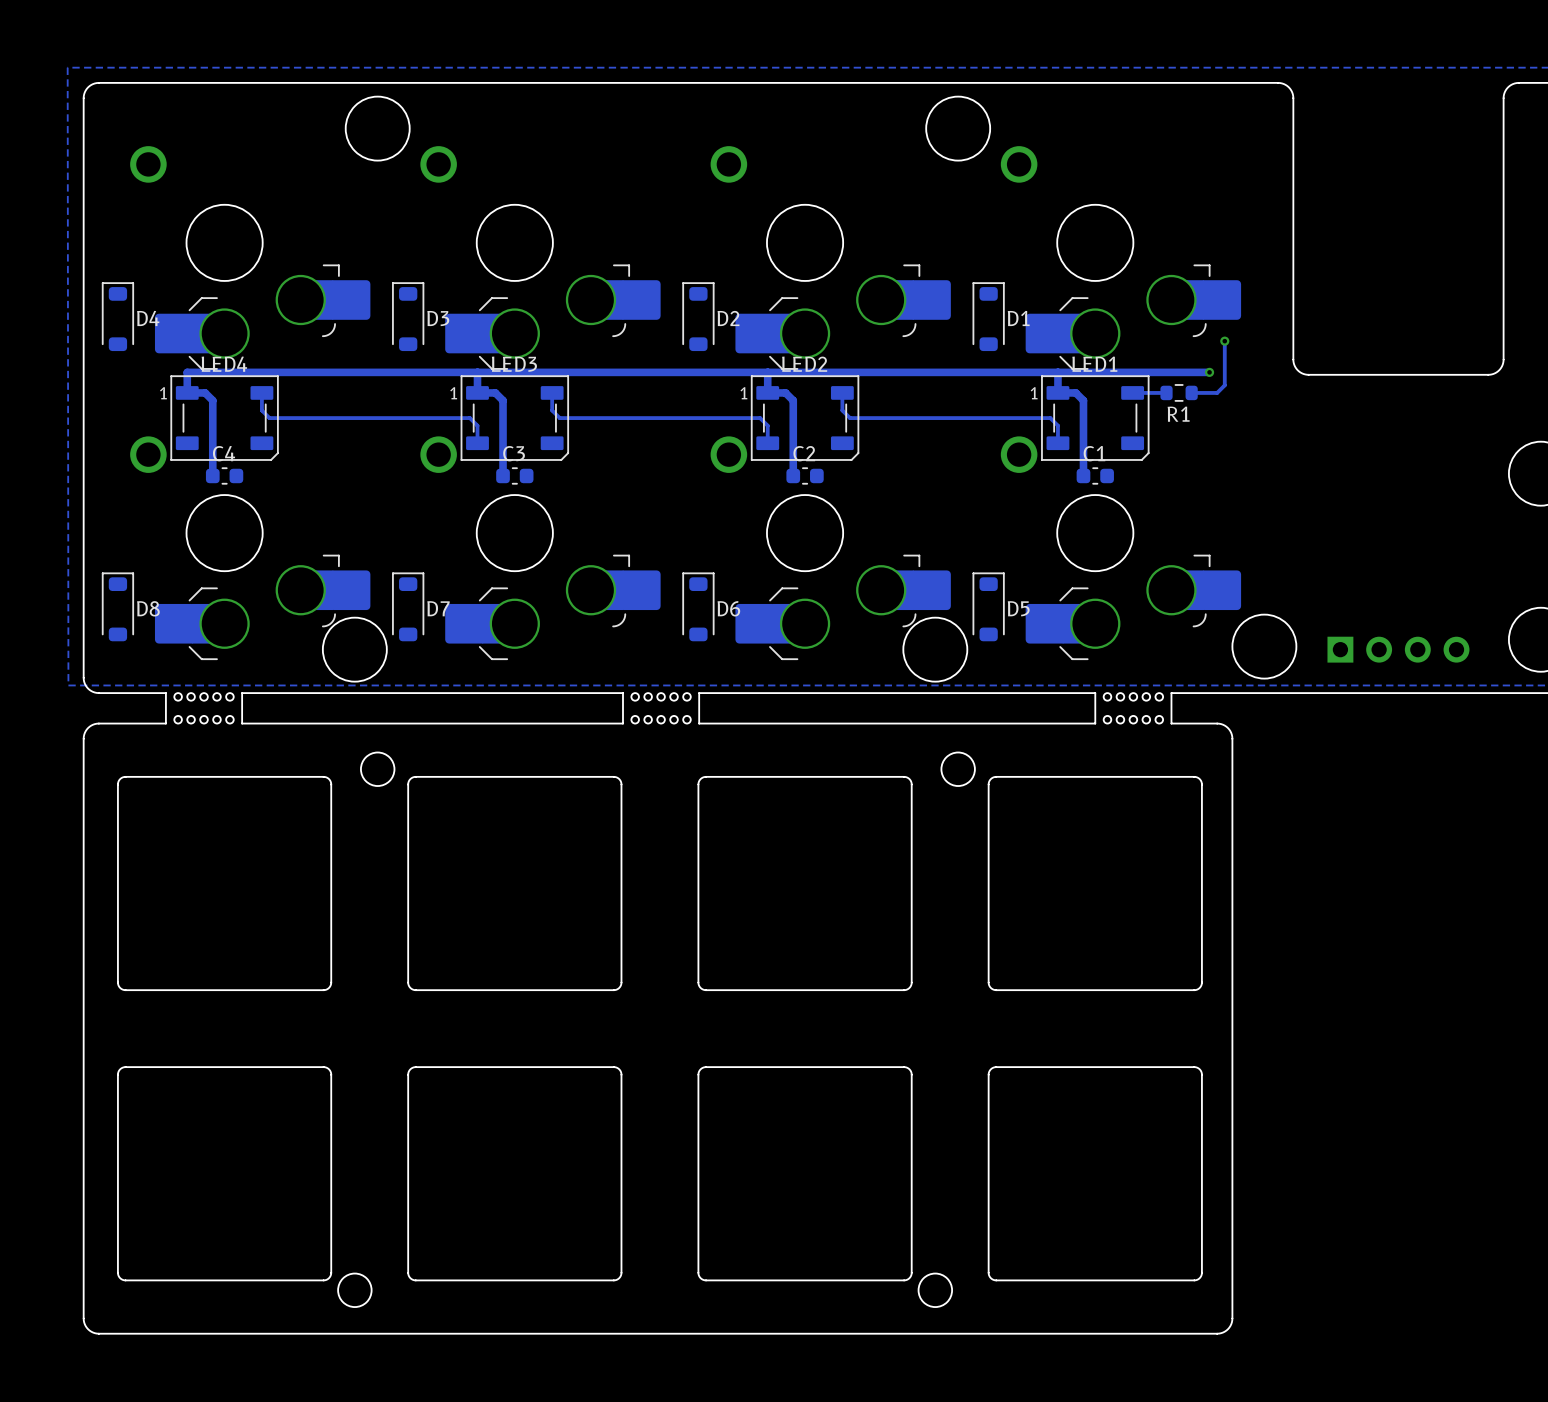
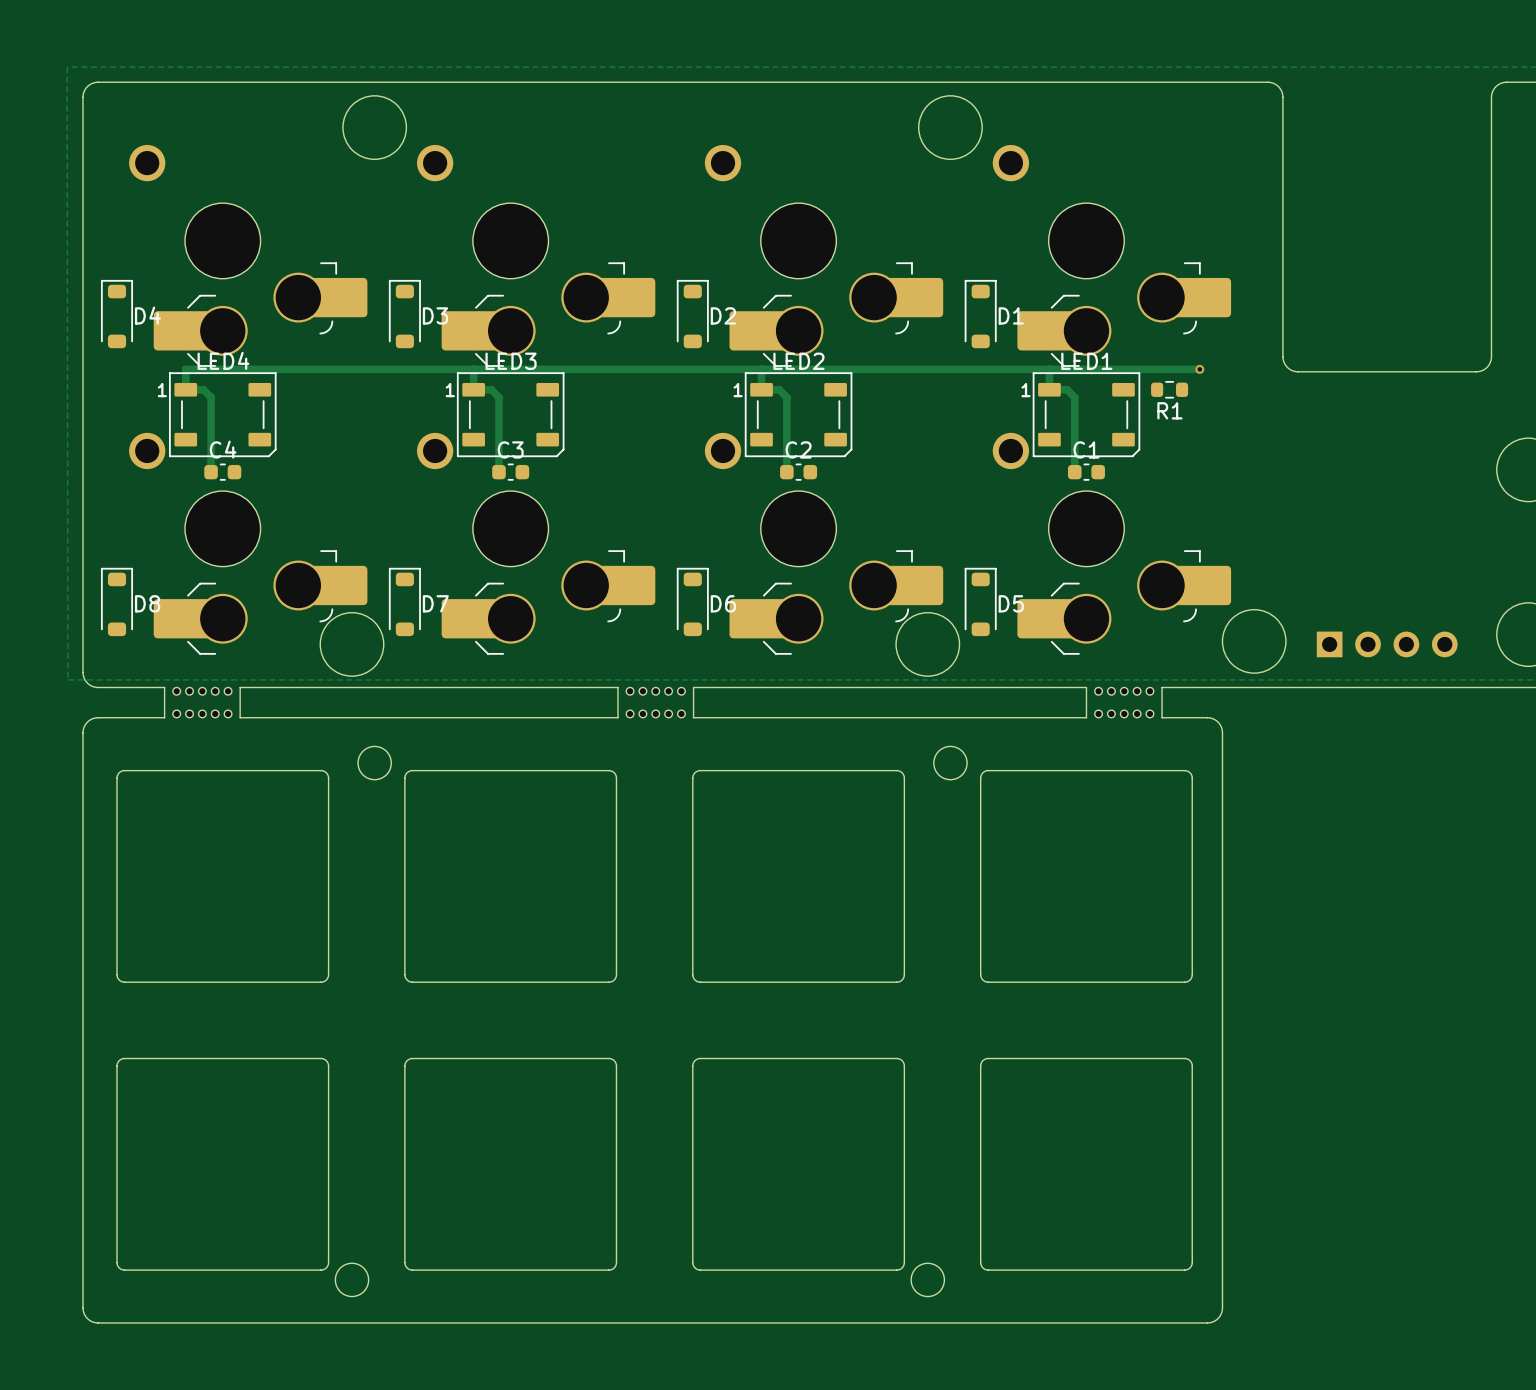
track: (1224, 341) (1224, 385) (1217, 392) (1191, 392) -> none
via: (1224, 341) -> none
track: (261, 392) (261, 410) (269, 418) (469, 418) (477, 425) (477, 443) -> none
track: (552, 392) (552, 410) (559, 418) (760, 418) (767, 425) (767, 443) -> none
track: (842, 392) (842, 410) (850, 418) (1050, 418) (1057, 425) (1057, 443) -> none
track: (1166, 392) (1132, 392) -> none

